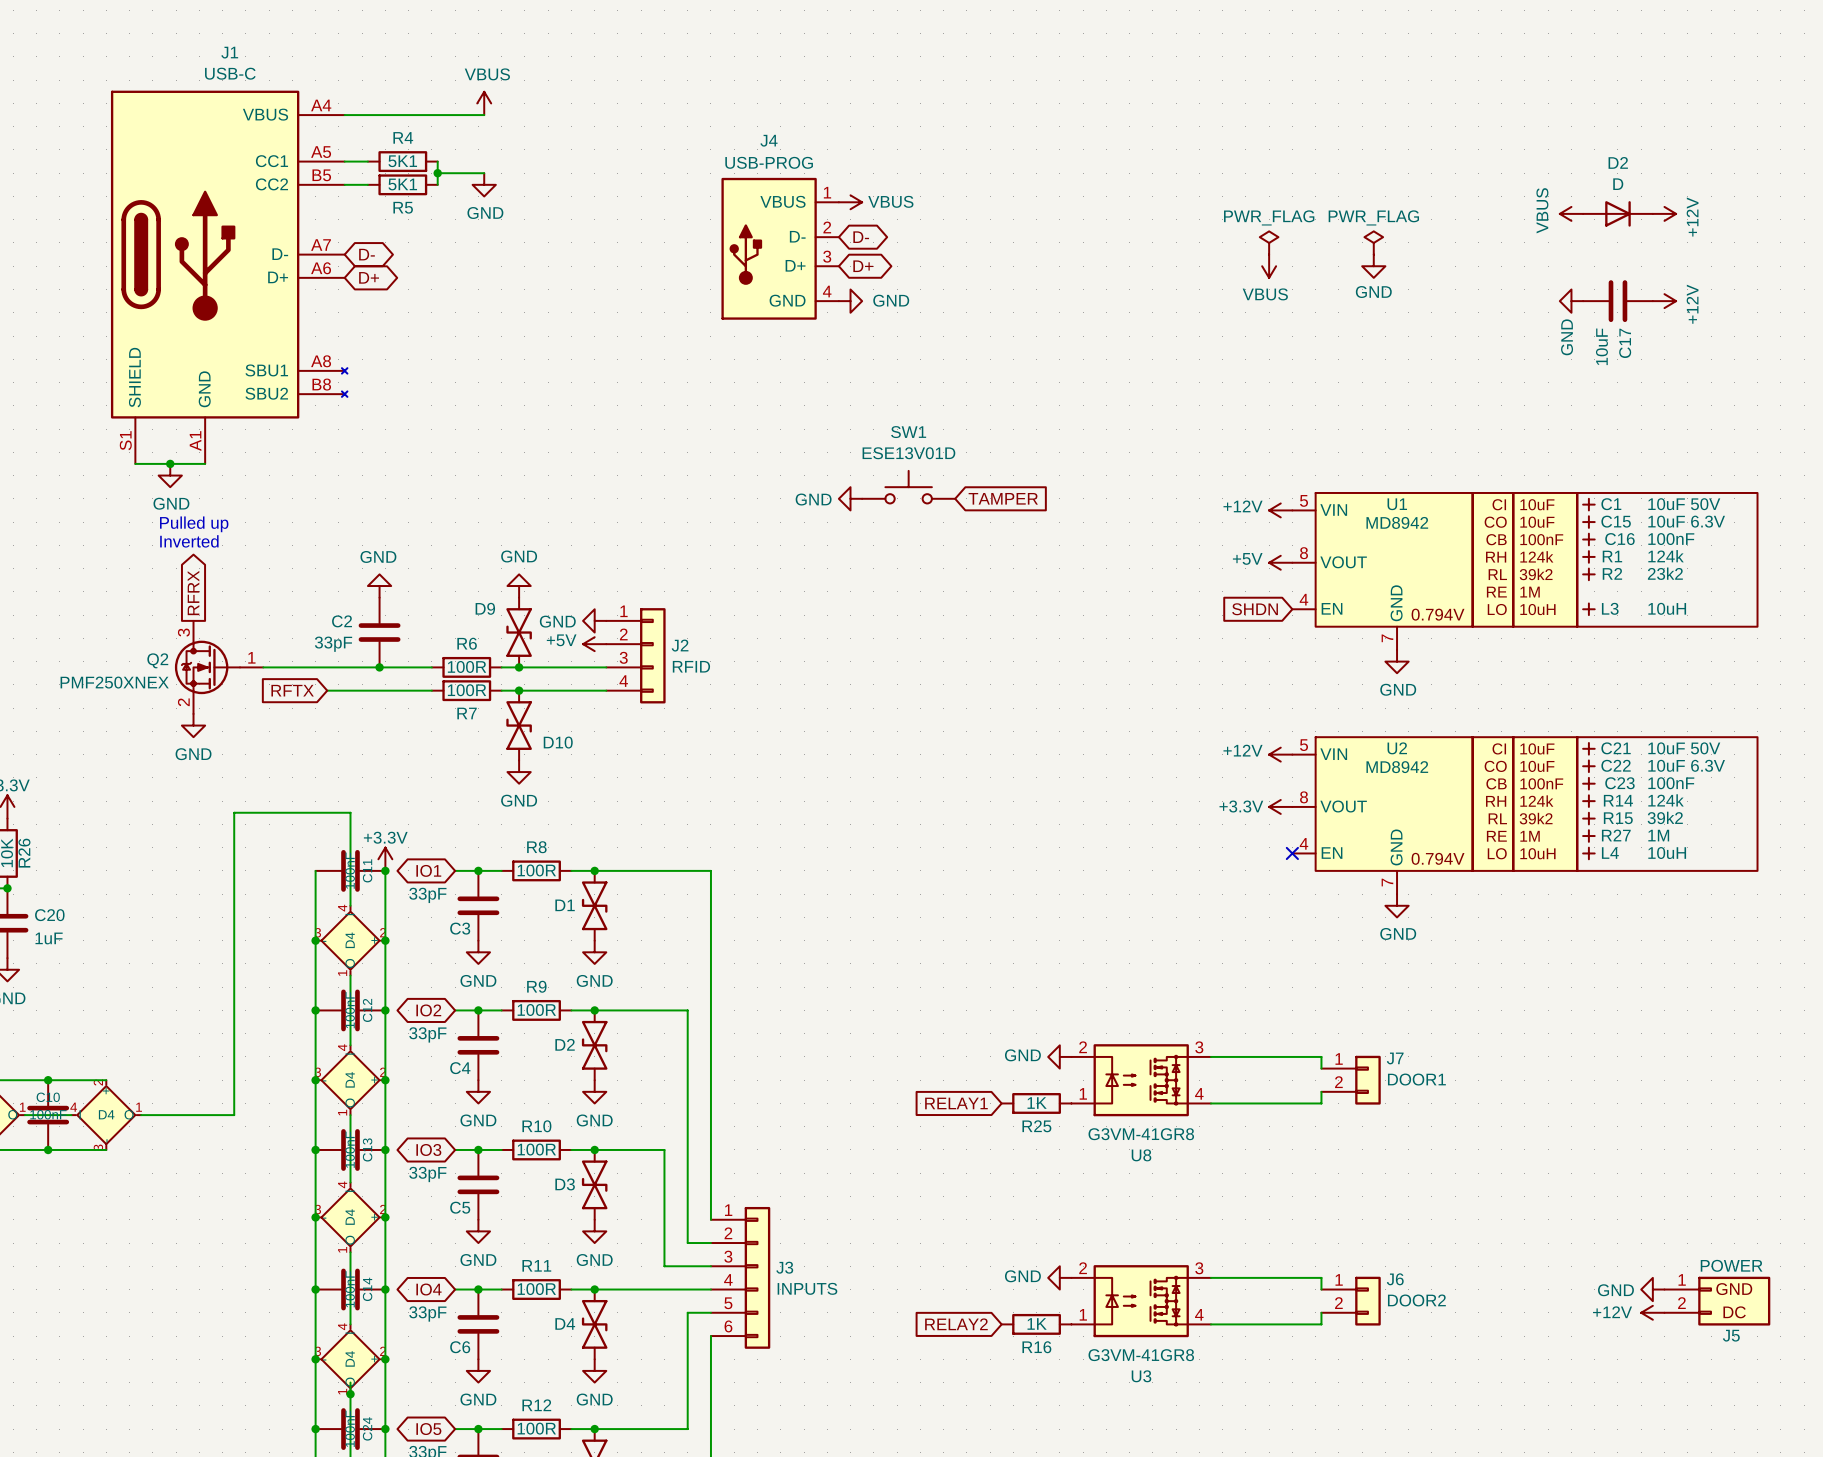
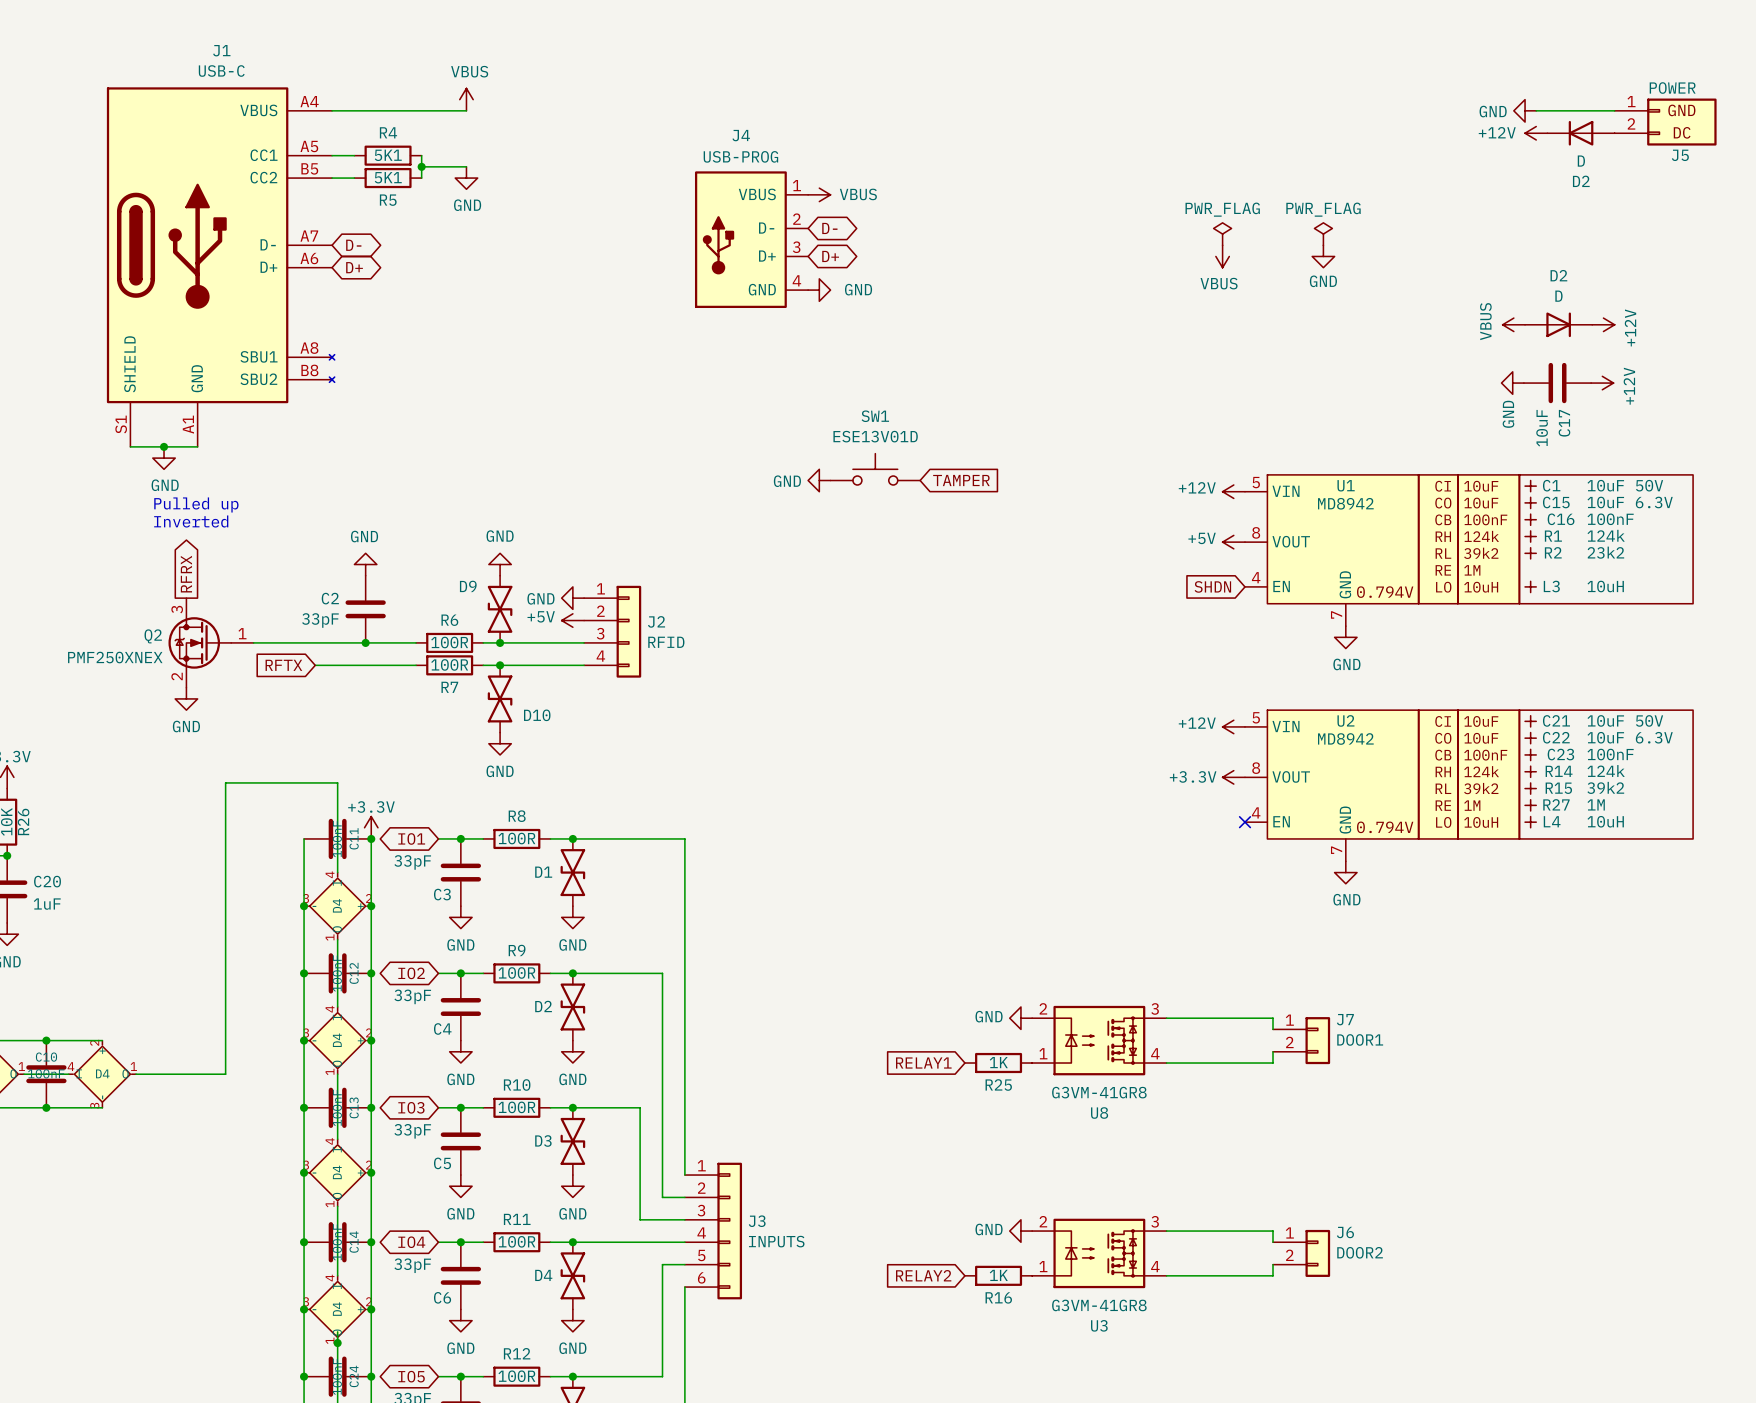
power symbol: none -> GND (1525, 110)
wire: none -> (1536, 110) (1614, 110)
power symbol: none -> +12V (1536, 133)
D2: none -> D (1581, 133)
power symbol position: VBUS (1571, 213) -> VBUS (1513, 324)
D2: D (1617, 213) -> none
power symbol: +12V (1664, 213) -> none
power symbol: GND (1571, 301) -> none
C17 position: (1617, 301) -> (1557, 383)
power symbol position: +12V (1664, 301) -> +12V (1603, 324)
D2: none -> D (1558, 324)
power symbol: none -> GND (1512, 383)
power symbol: none -> +12V (1602, 383)
power symbol: GND (1652, 1289) -> none
J5 position: (1717, 1301) -> (1665, 122)
power symbol: +12V (1652, 1312) -> none

